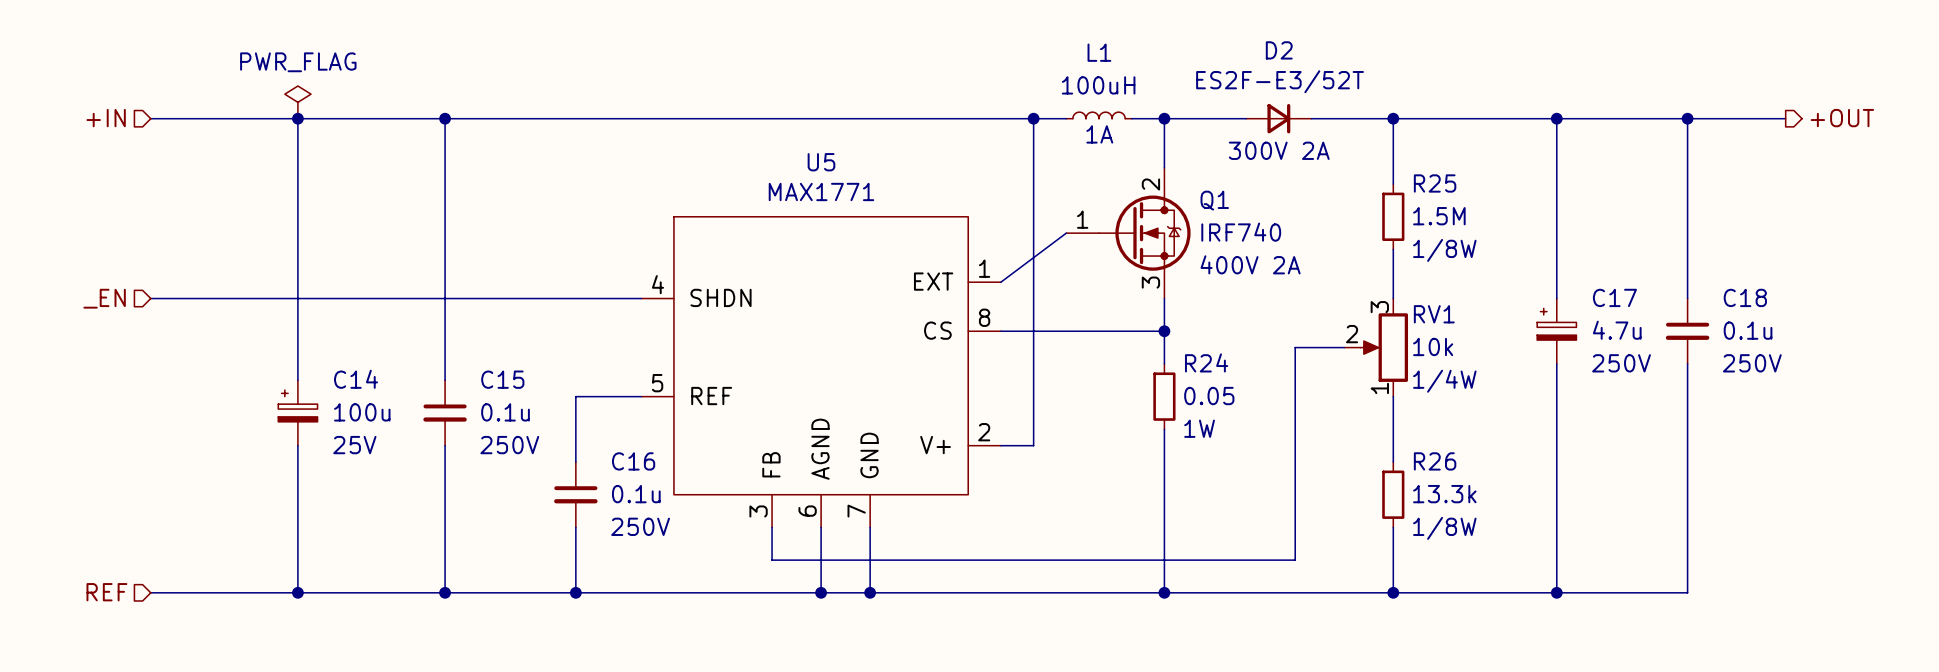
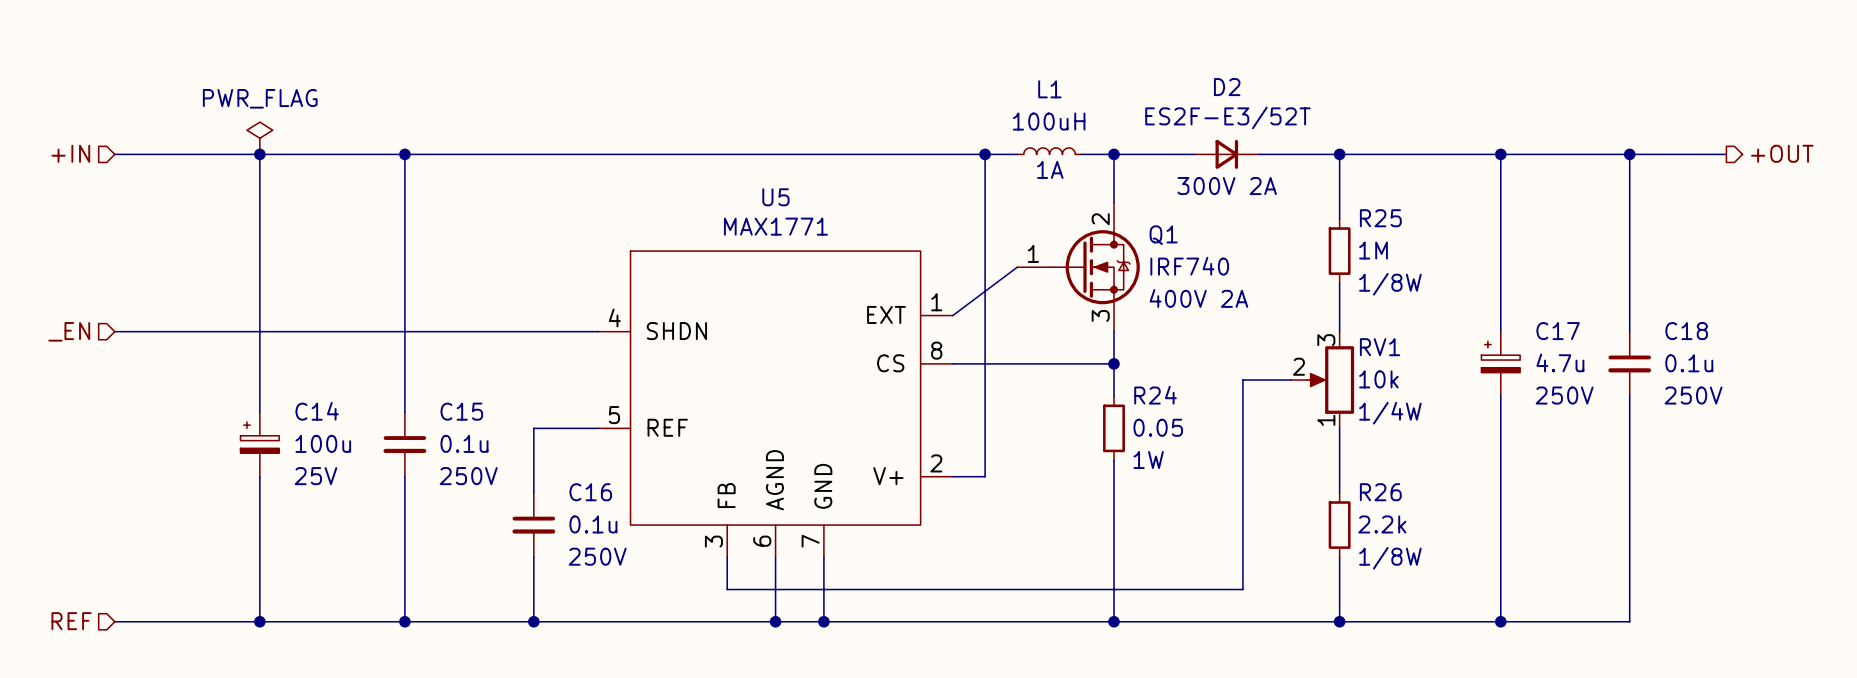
R25 value: 1.5M (1439, 216) -> 1M (1373, 250)
R26 value: 13.3k (1444, 494) -> 2.2k (1382, 524)

